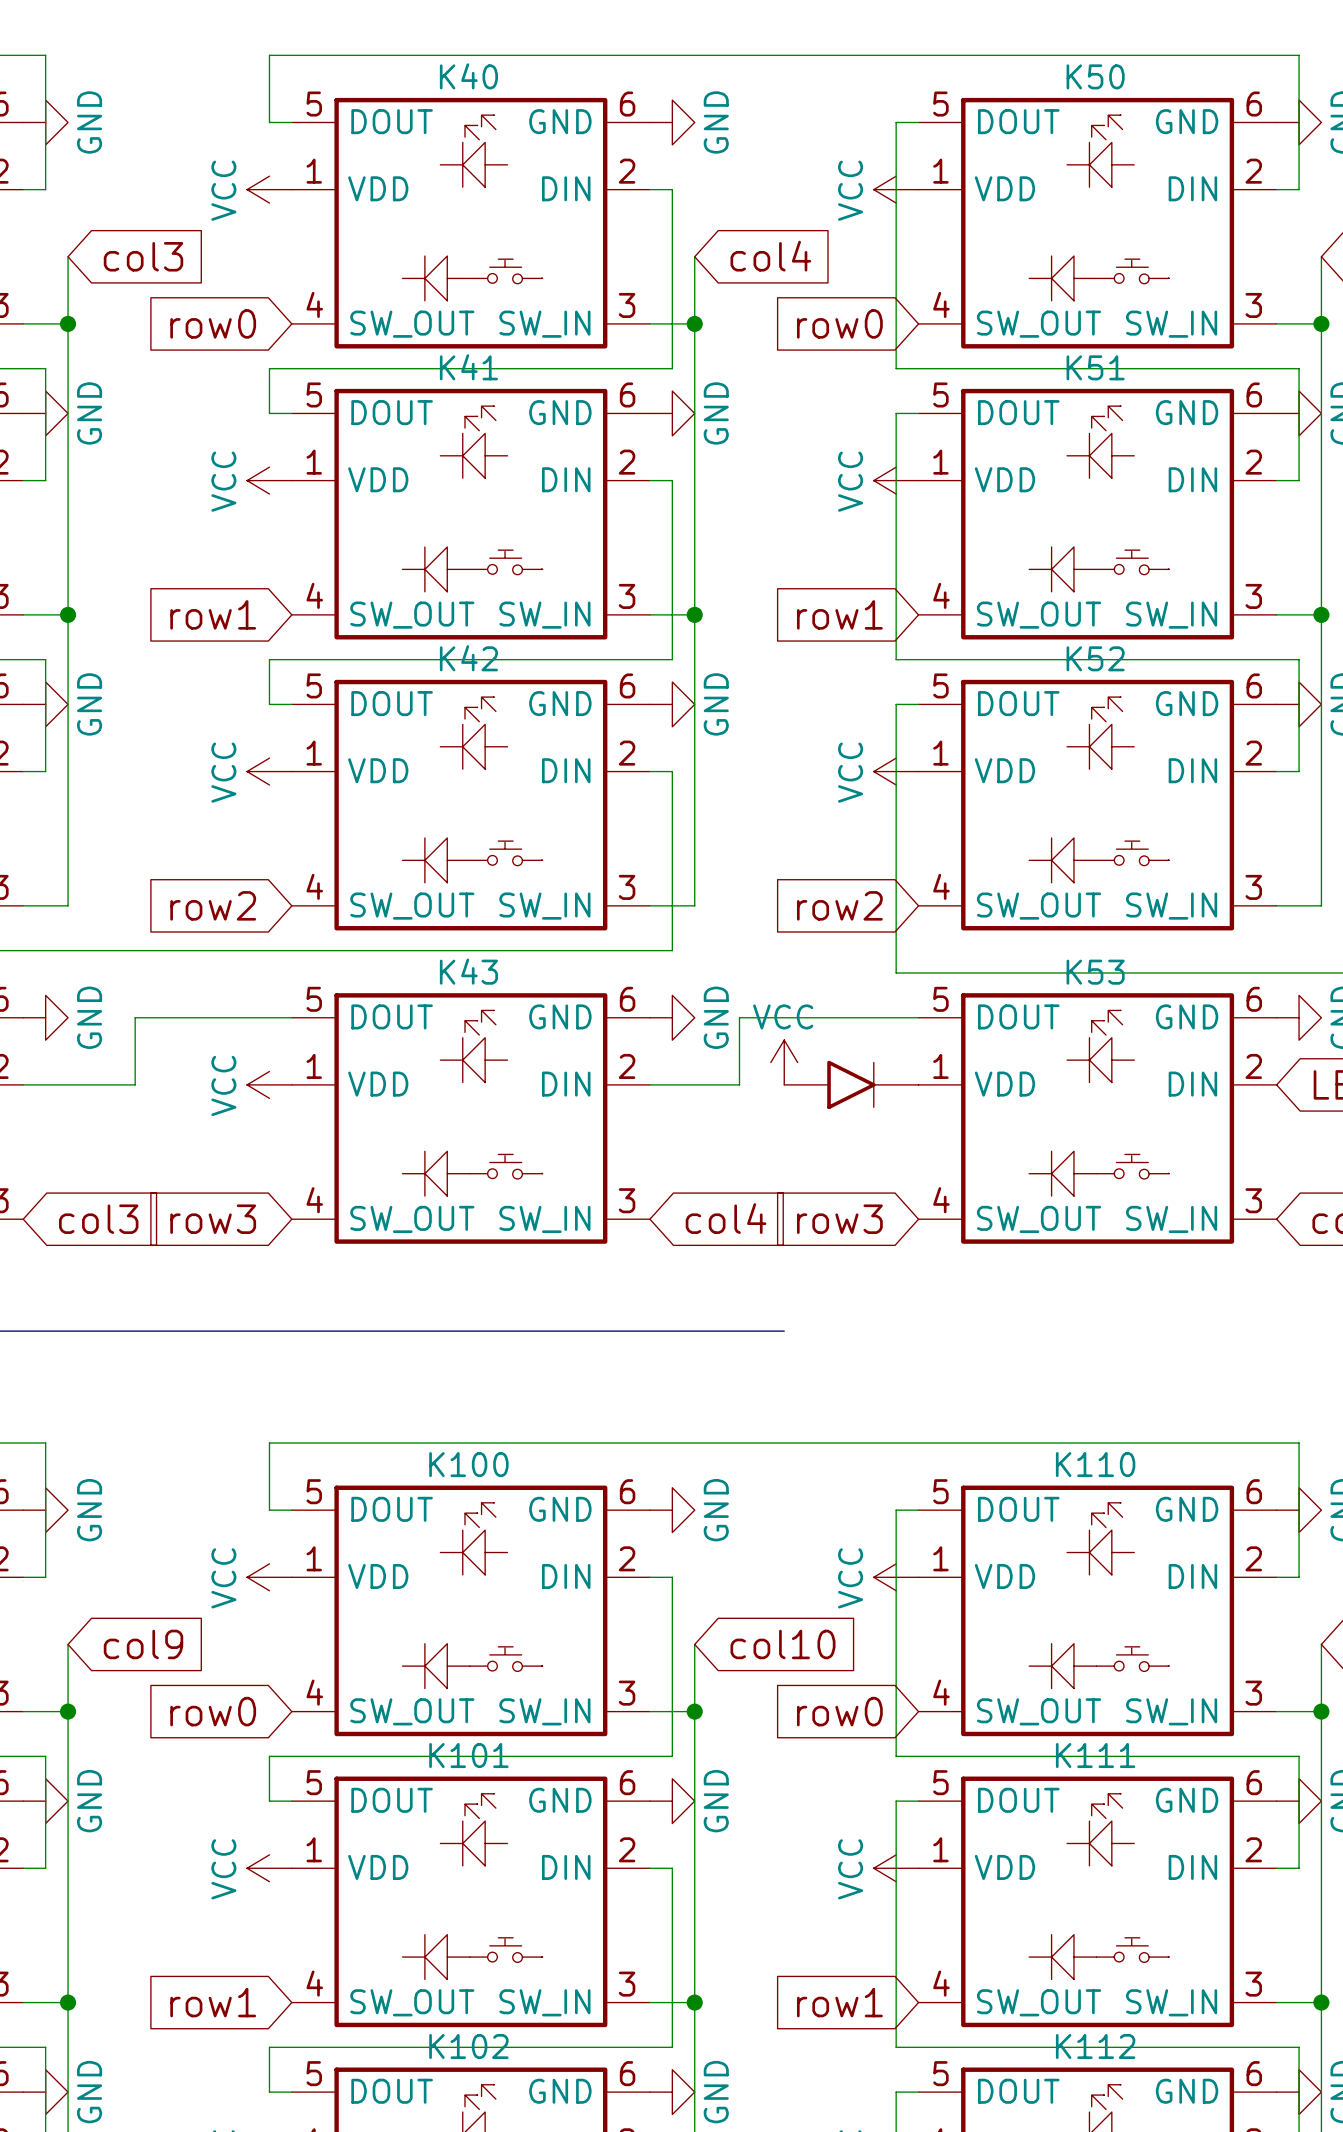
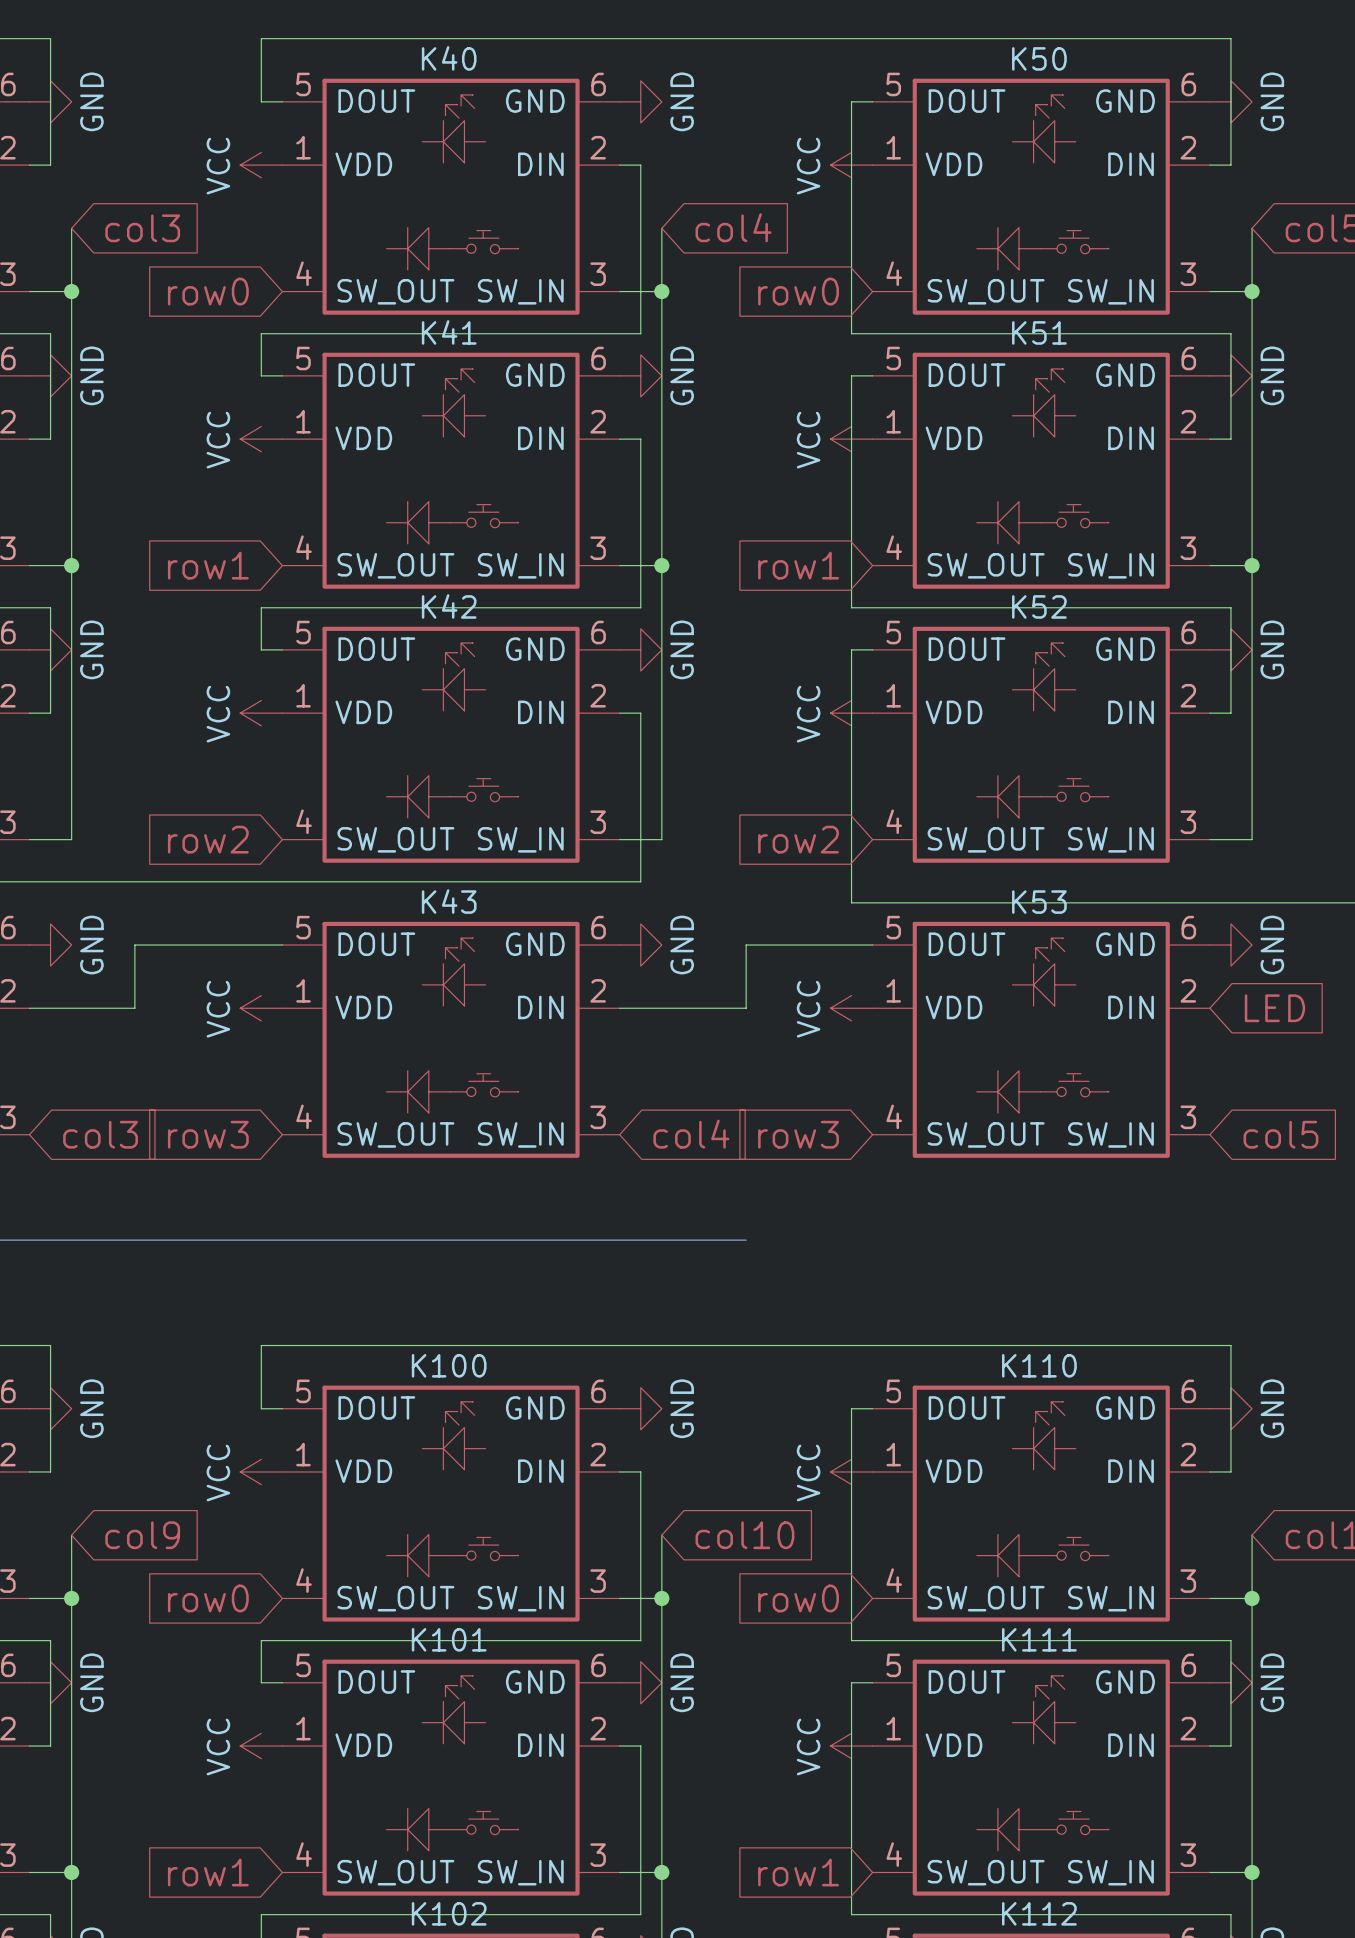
wire: (784, 1017) (739, 1017) (739, 1084) -> (746, 945) (746, 1008) (704, 1008)
power symbol rotation: 0° (784, 1062) -> 90° counterclockwise (851, 1008)
power symbol position: VCC (784, 1062) -> VCC (851, 1008)
part: (851, 1084) -> none

